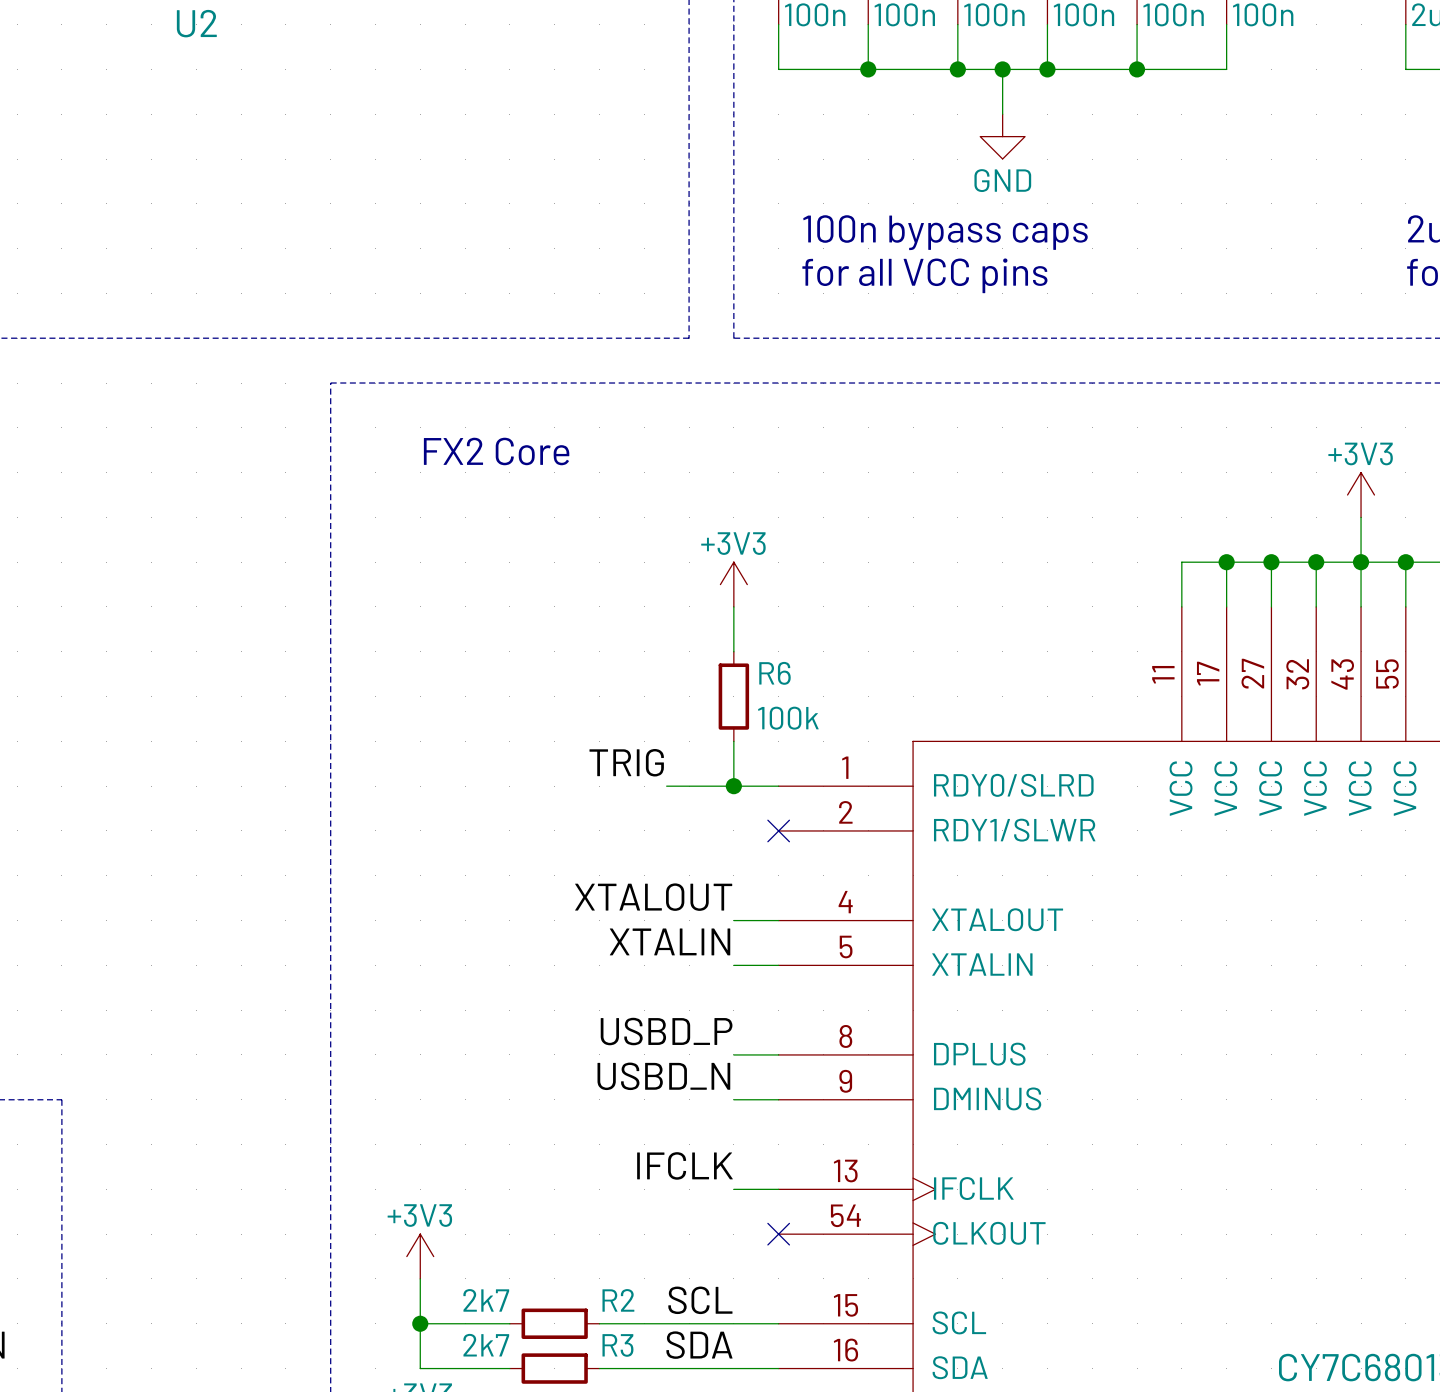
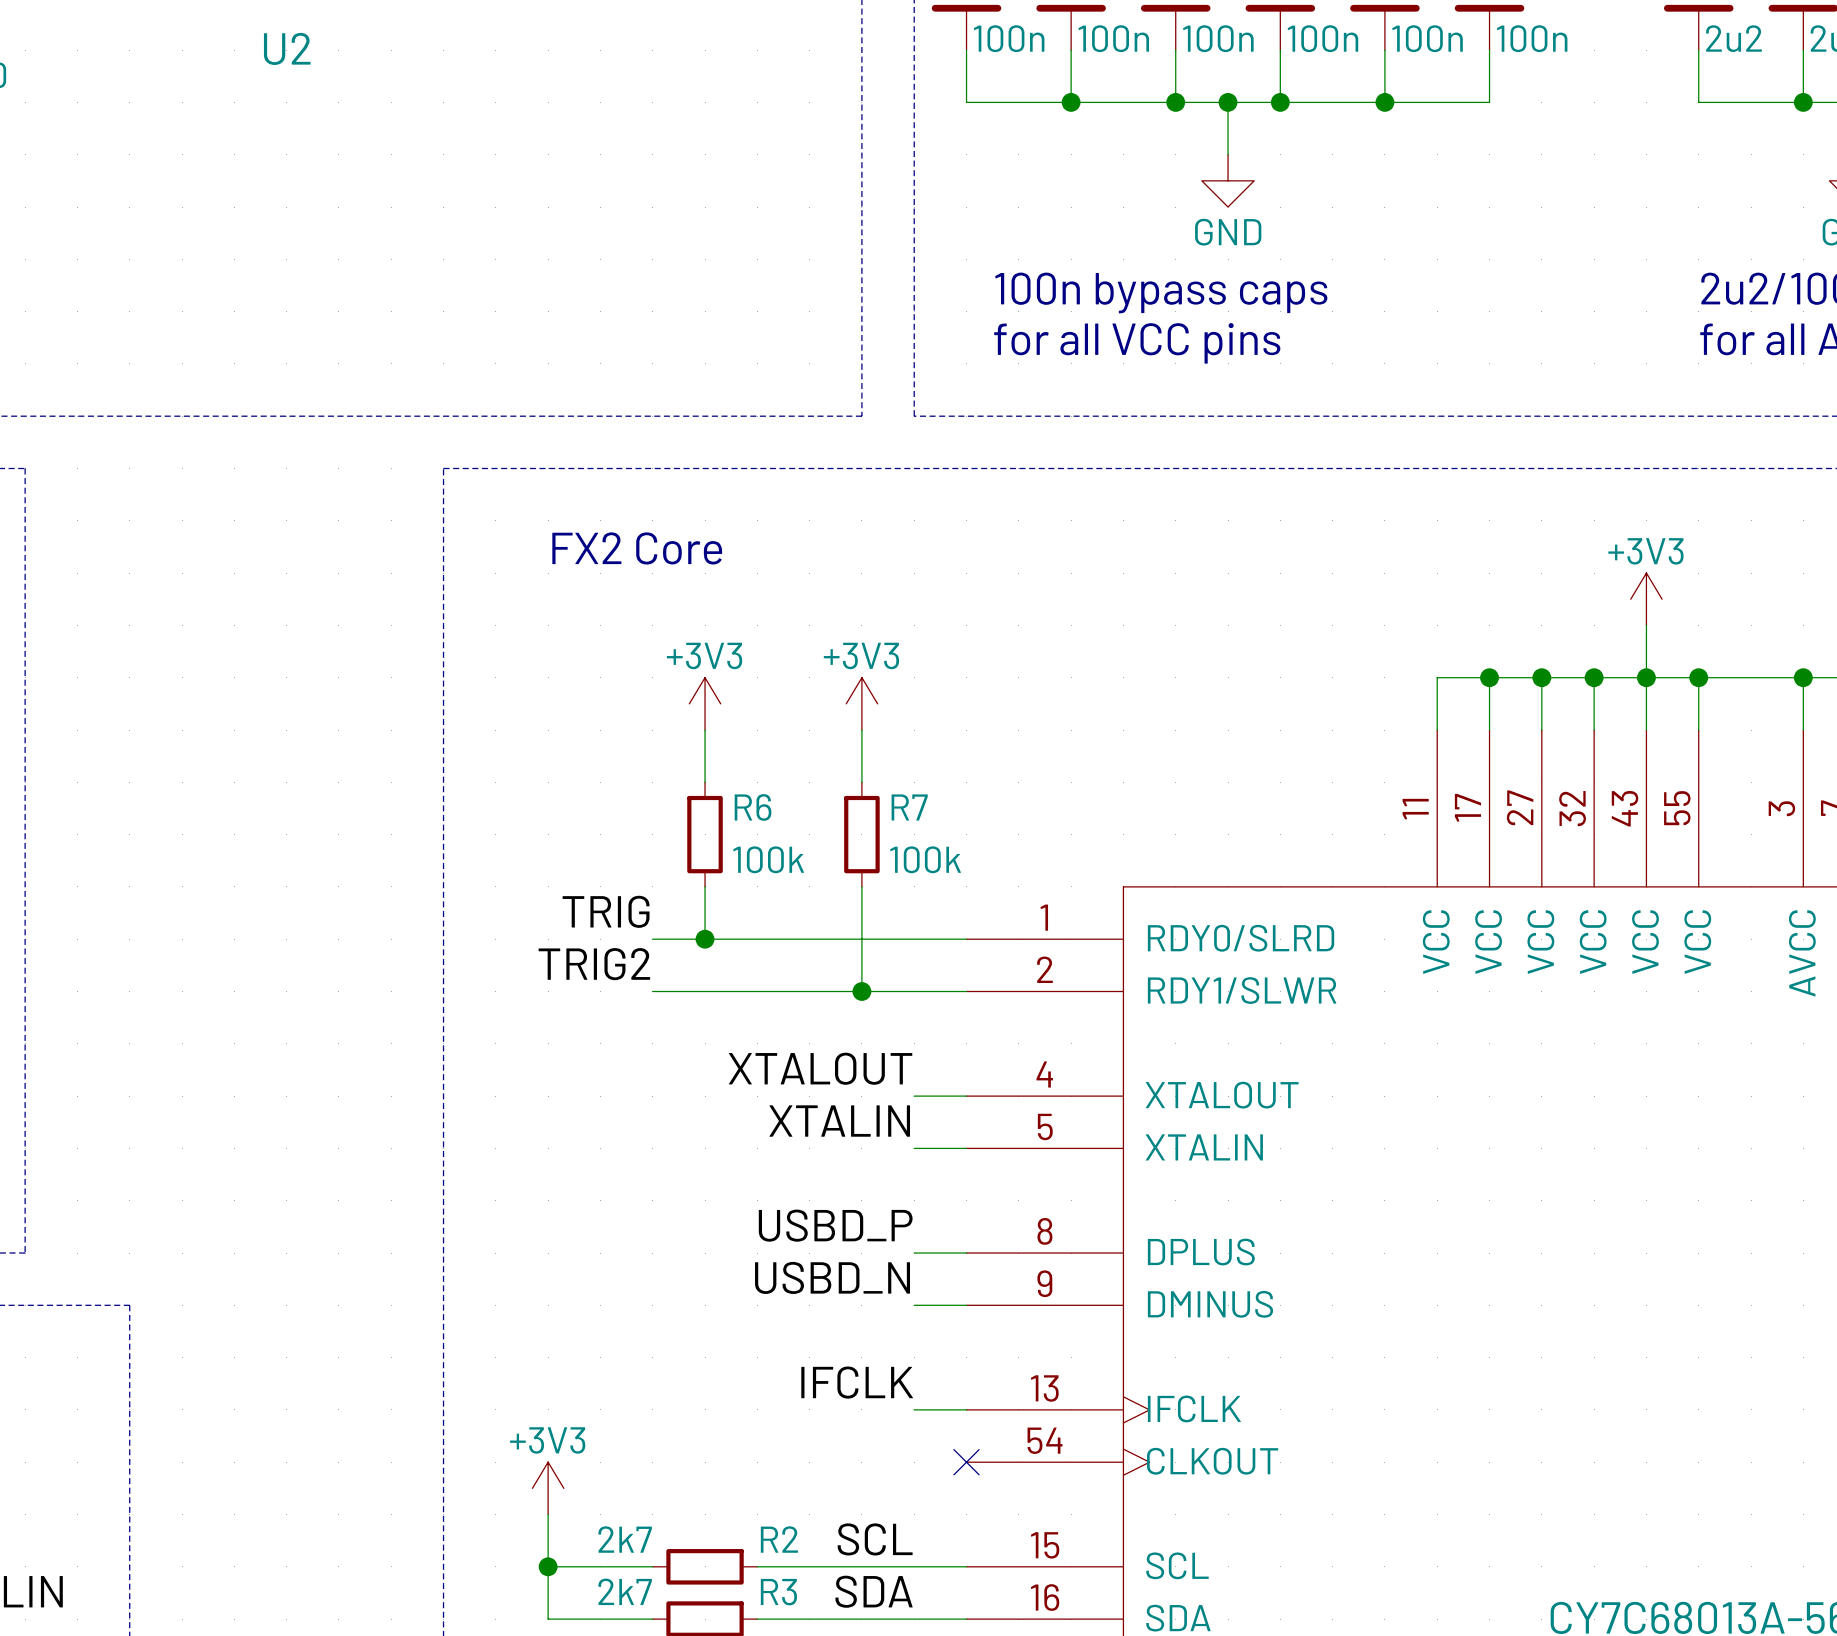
power symbol: none -> +3V3 (705, 703)
power symbol position: +3V3 (733, 584) -> +3V3 (861, 703)
wire: none -> (861, 730) (861, 782)
wire: (733, 606) (733, 651) -> (705, 730) (705, 782)
R7: none -> 100k (861, 834)
R6 position: (733, 696) -> (705, 834)
wire: none -> (861, 886) (861, 991)
wire: (733, 741) (733, 786) -> (705, 886) (705, 939)
label position: TRIG (626, 762) -> TRIG (606, 911)
wire: none -> (652, 939) (835, 939)
junction: none -> (705, 939)
junction position: (733, 786) -> (861, 991)
label: none -> TRIG2 (594, 964)
wire: none -> (652, 991) (966, 991)
no-connect mark: (778, 830) -> none

